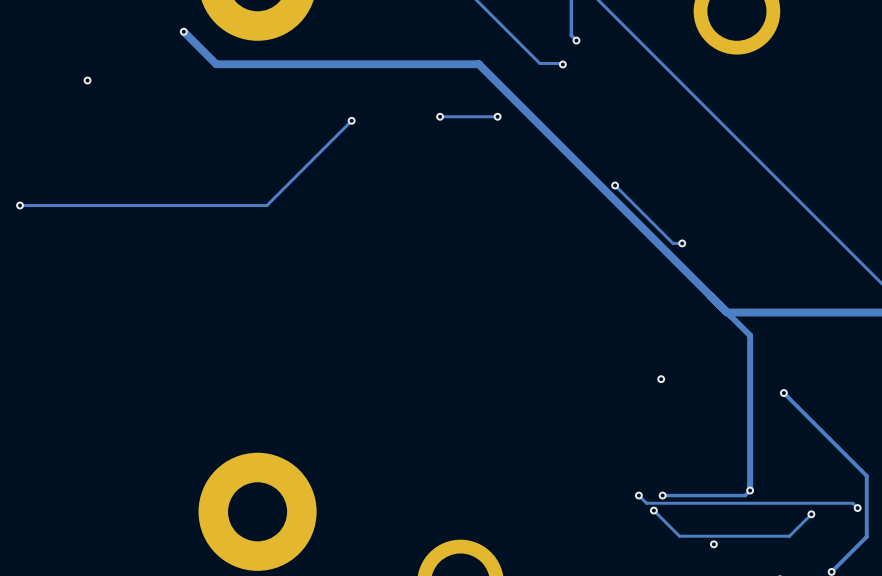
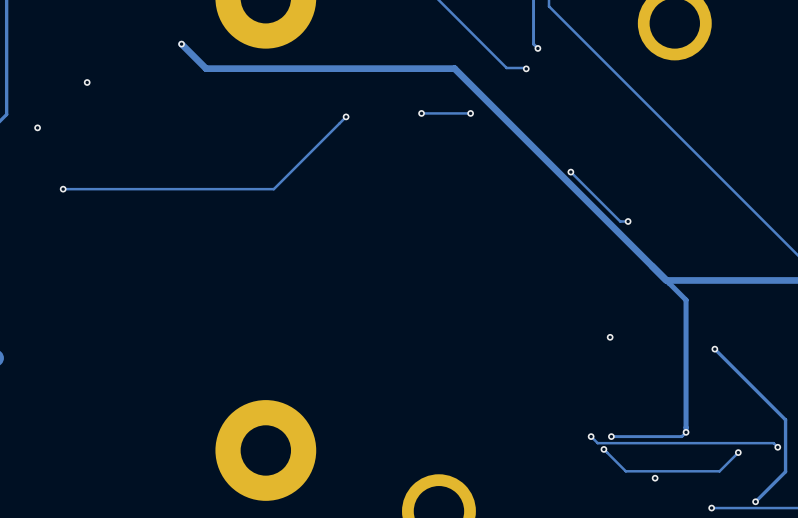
track: (183, 31) (216, 64) -> (181, 44) (206, 68) (230, 68)
via position: (183, 31) -> (181, 44)
via position: (87, 80) -> (87, 82)

